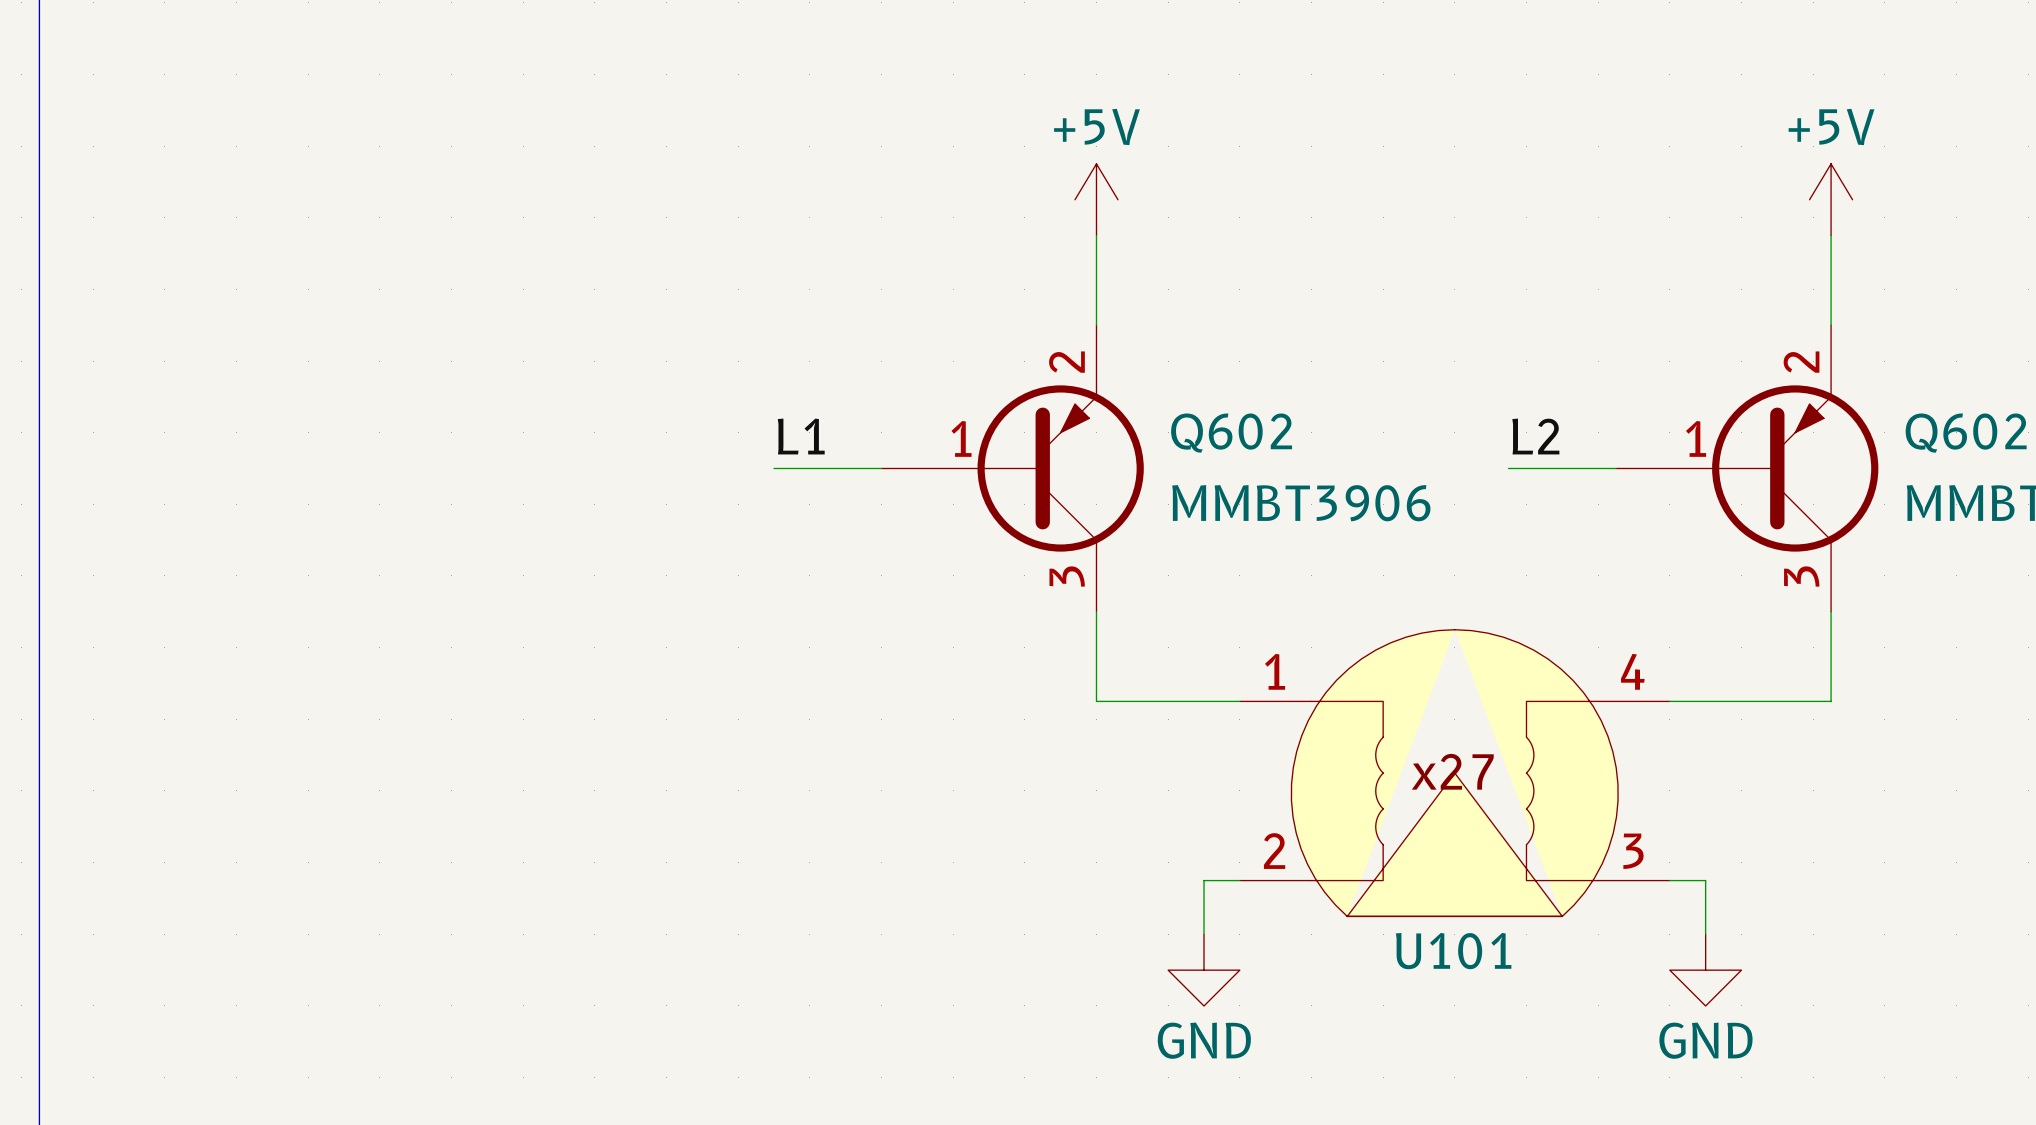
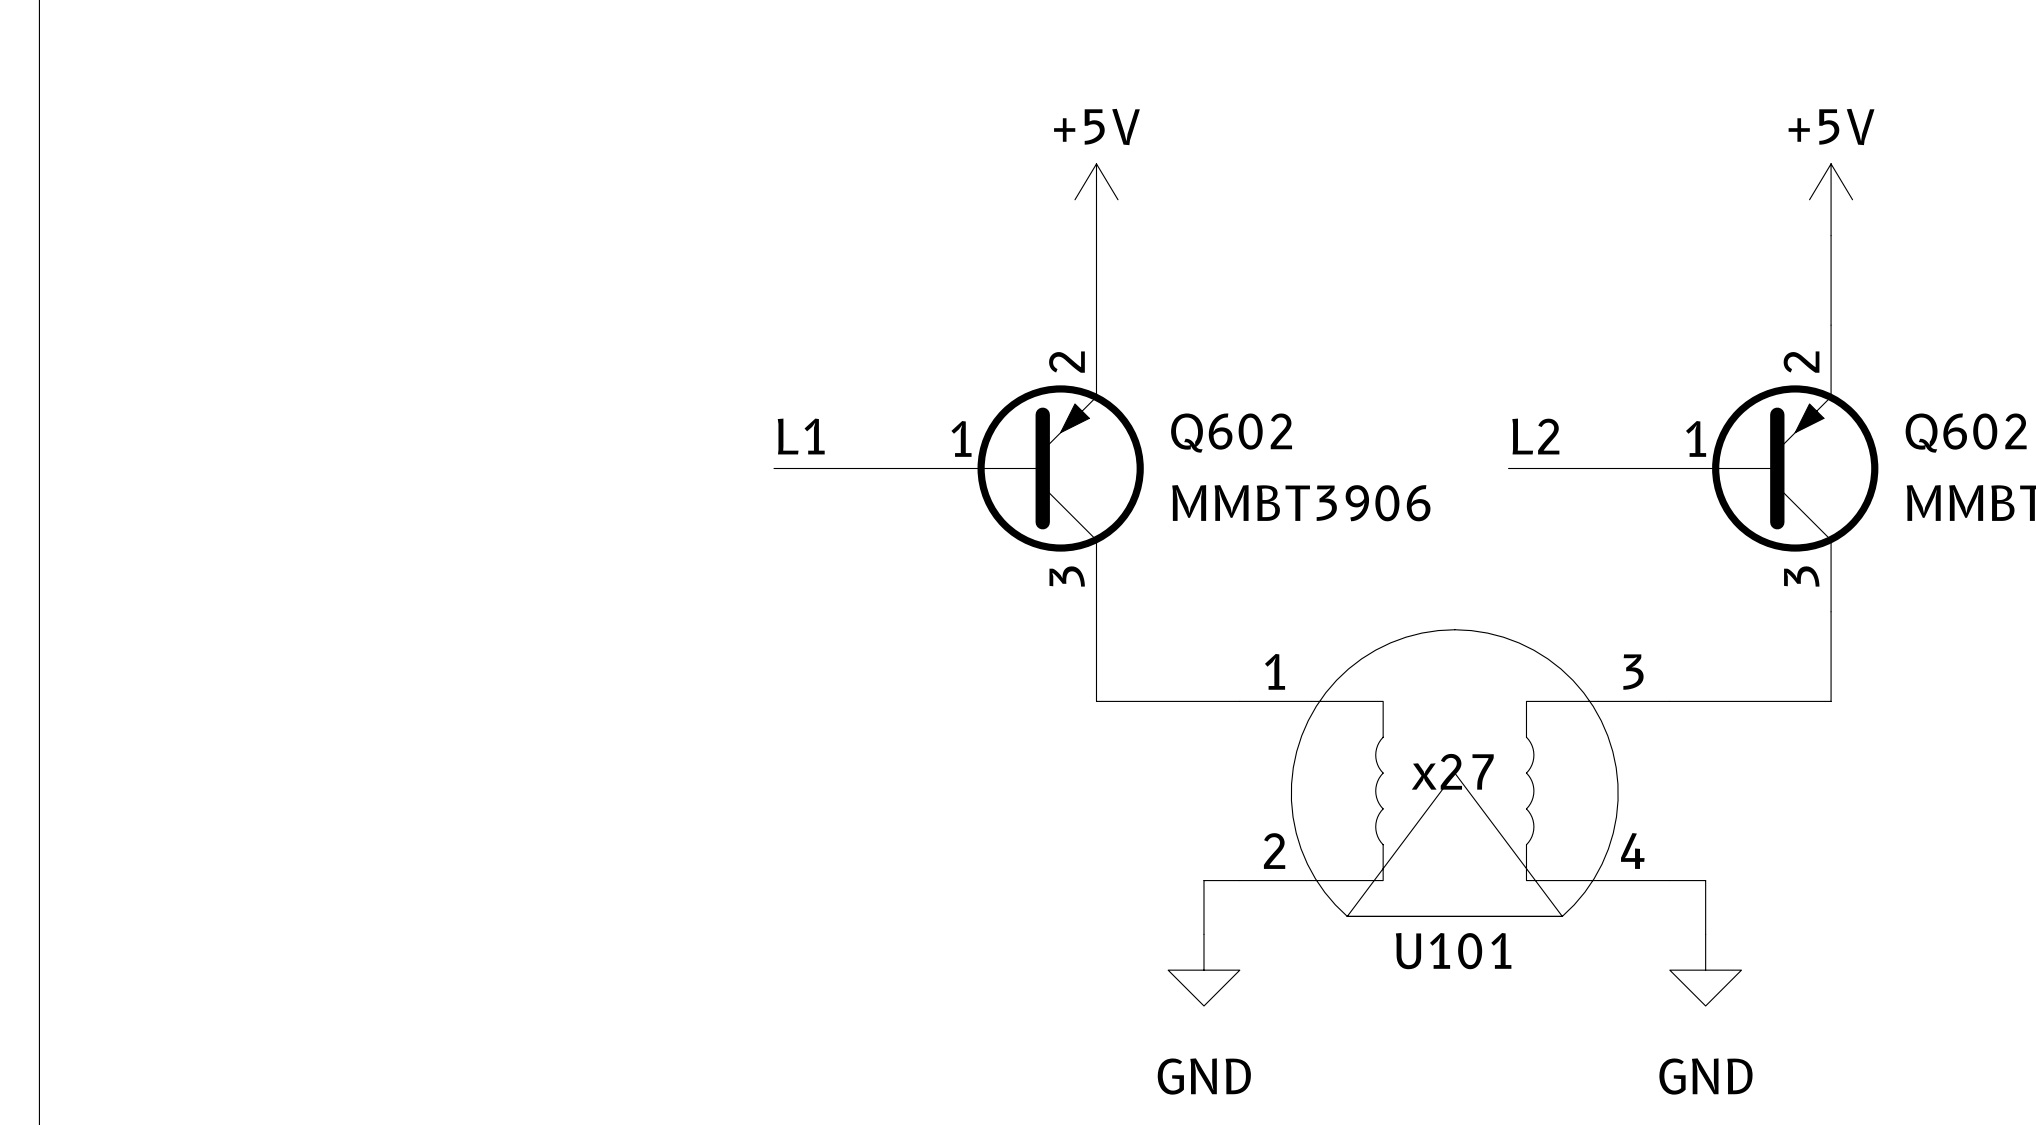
U101 pin number: 4 (1632, 671) -> 3 (1633, 672)
U101 pin number: 3 (1633, 851) -> 4 (1632, 851)
power symbol text position: GND (1204, 1040) -> GND (1204, 1076)
power symbol text position: GND (1705, 1040) -> GND (1705, 1076)

